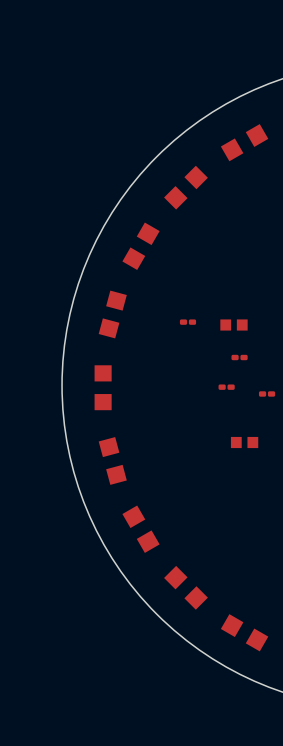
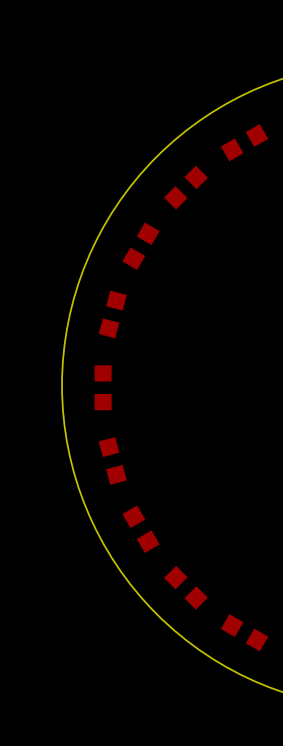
part: (187, 322) -> none
part: (233, 324) -> none
part: (239, 357) -> none
part: (226, 387) -> none
part: (267, 393) -> none
part: (244, 442) -> none

